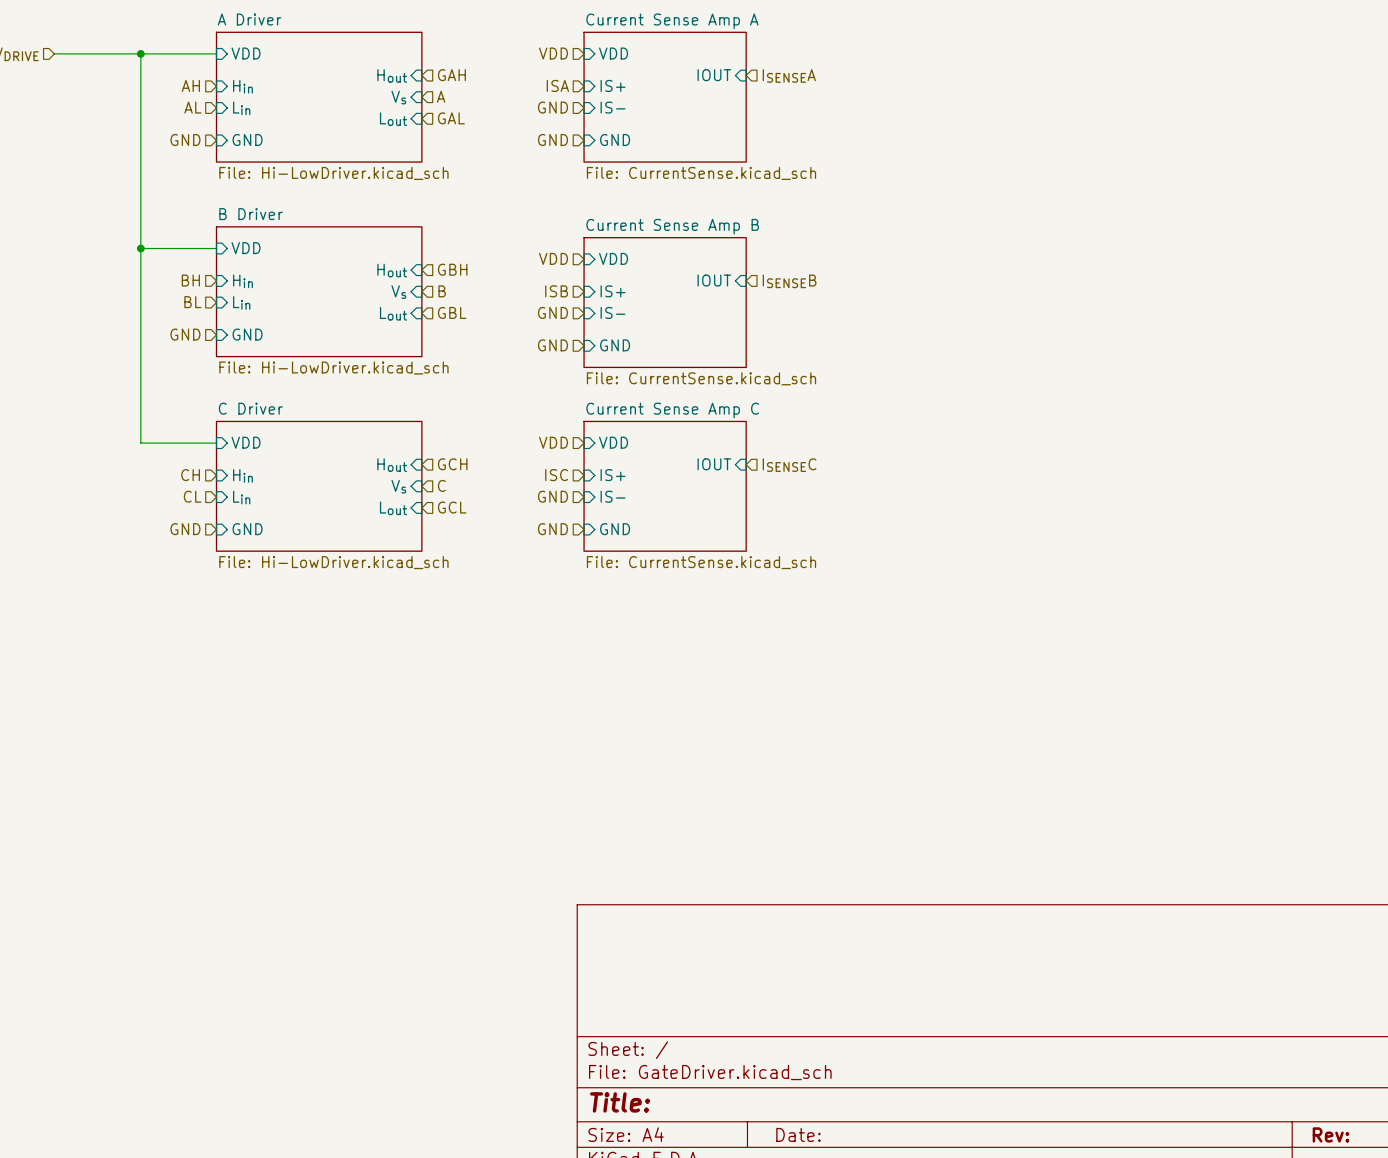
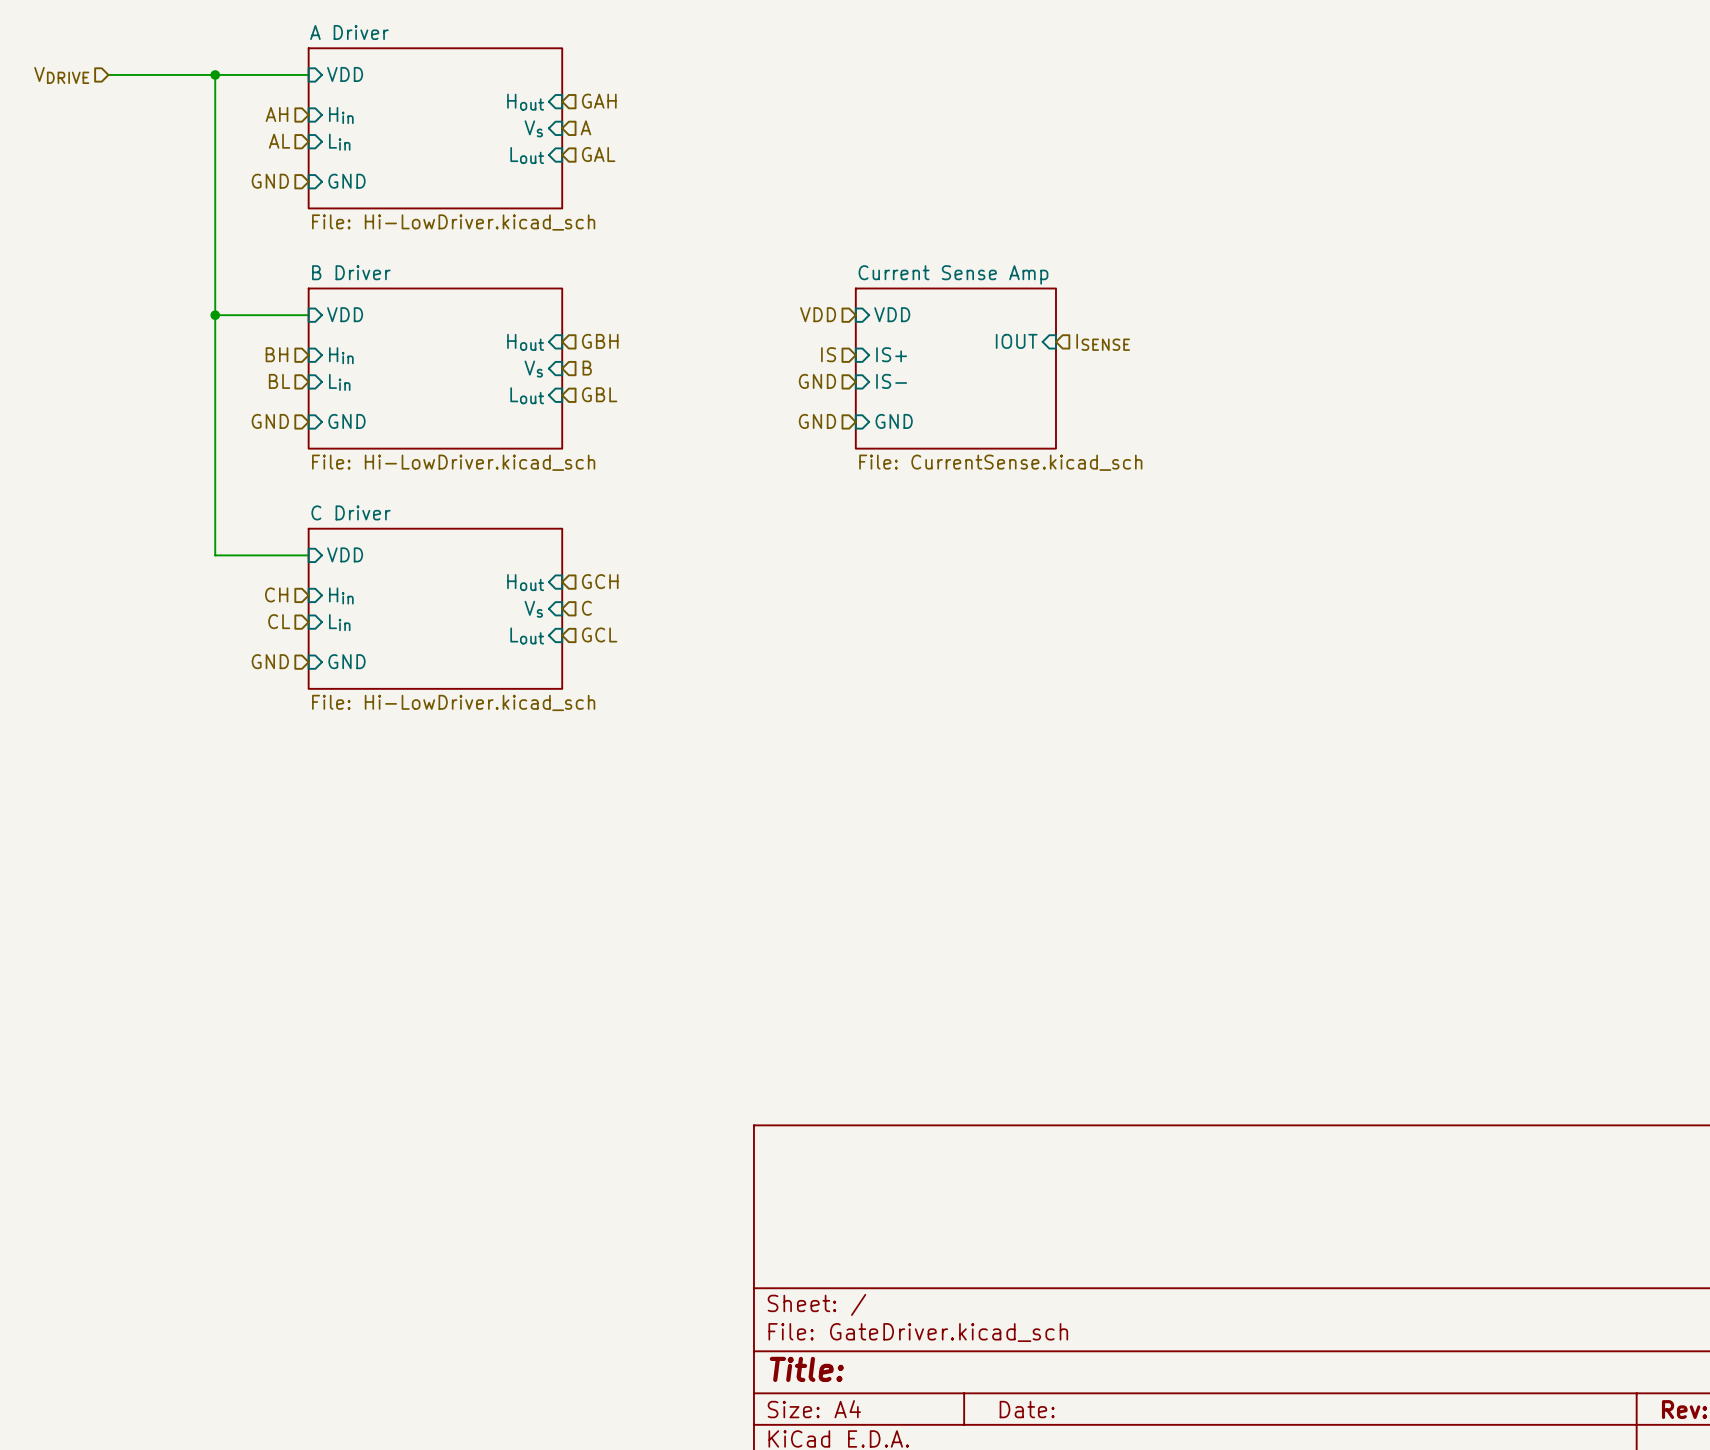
hierarchical label: VDD (553, 53) -> none
sheet pin: VDD (613, 53) -> none
sheet pin: IOUT (714, 75) -> none
hierarchical label: ISENSEA (789, 75) -> none
hierarchical label: ISA (557, 85) -> none
sheet pin: IS+ (613, 85) -> none
sheet Current Sense Amp A: File: CurrentSense.kicad_sch (665, 97) -> none
hierarchical label: GND (552, 107) -> none
sheet pin: IS- (613, 107) -> none
hierarchical label: GND (552, 140) -> none
sheet pin: GND (615, 140) -> none
hierarchical label position: VDD (553, 258) -> VDD (818, 314)
sheet pin position: VDD (613, 258) -> VDD (892, 314)
hierarchical label: none -> IS (828, 354)
sheet pin position: IOUT (714, 280) -> IOUT (1016, 341)
hierarchical label: ISENSEB (789, 281) -> ISENSE (1103, 342)
hierarchical label: ISB (556, 291) -> none
sheet pin position: IS+ (613, 291) -> IS+ (891, 354)
sheet Current Sense Amp: none -> File: CurrentSense.kicad_sch (955, 368)
hierarchical label: none -> GND (817, 381)
sheet Current Sense Amp B: File: CurrentSense.kicad_sch (665, 302) -> none
hierarchical label: GND (552, 312) -> none
sheet pin position: IS- (613, 312) -> IS- (891, 381)
hierarchical label: none -> GND (817, 421)
hierarchical label: GND (552, 345) -> none
sheet pin position: GND (615, 345) -> GND (894, 421)
hierarchical label: VDD (553, 442) -> none
sheet pin: VDD (613, 442) -> none
sheet pin: IOUT (714, 464) -> none
hierarchical label: ISENSEC (789, 465) -> none
hierarchical label: ISC (556, 475) -> none
sheet pin: IS+ (613, 475) -> none
sheet Current Sense Amp C: File: CurrentSense.kicad_sch (665, 486) -> none
hierarchical label: GND (552, 496) -> none
sheet pin: IS- (613, 496) -> none
hierarchical label: GND (552, 529) -> none
sheet pin: GND (615, 529) -> none

